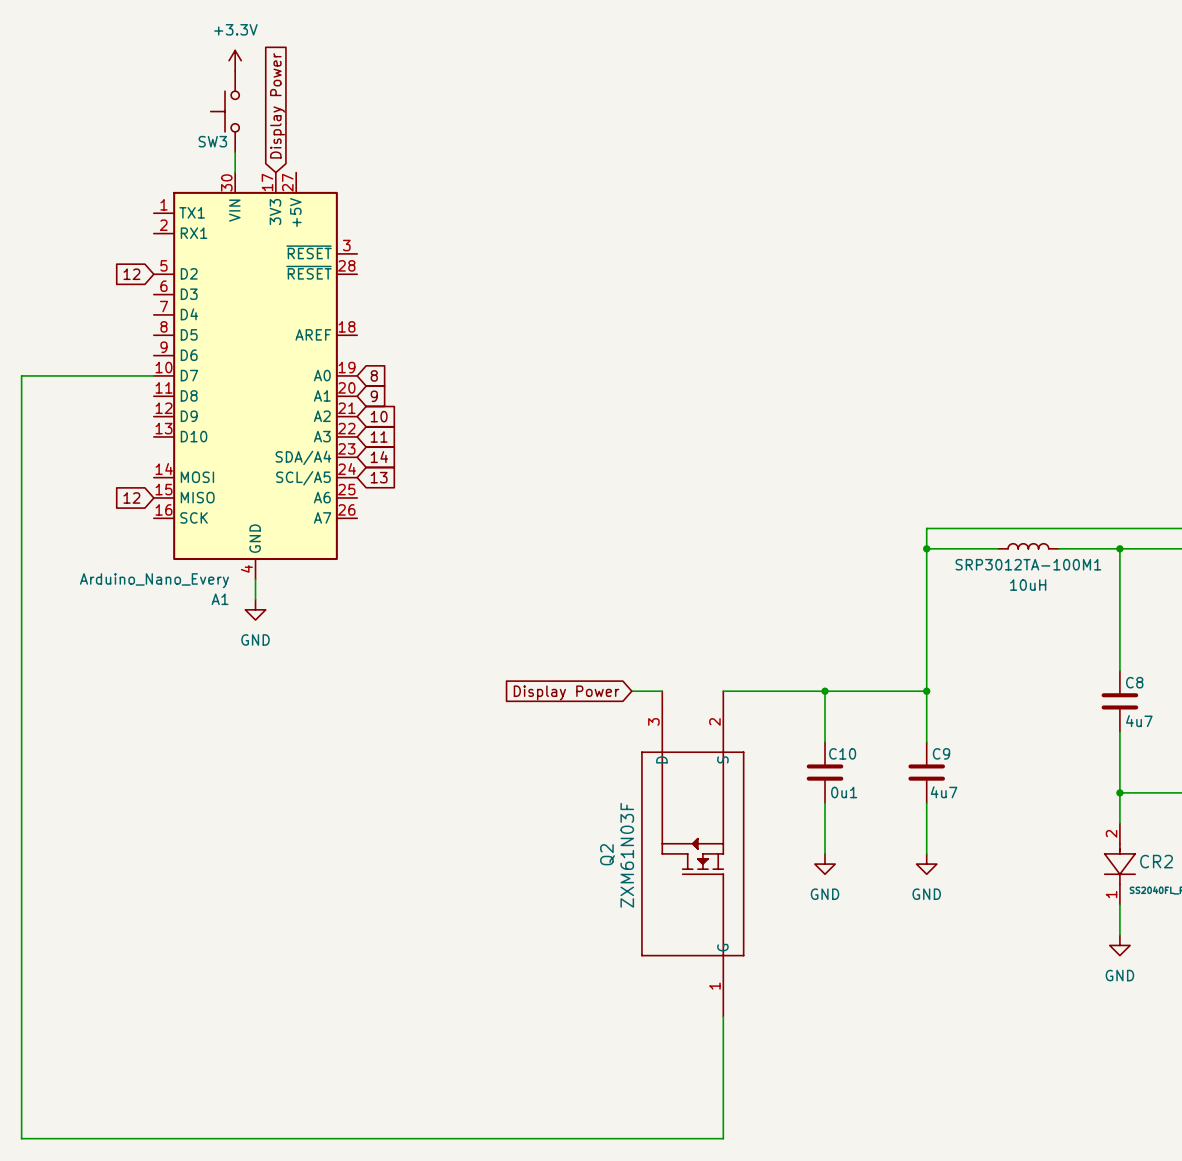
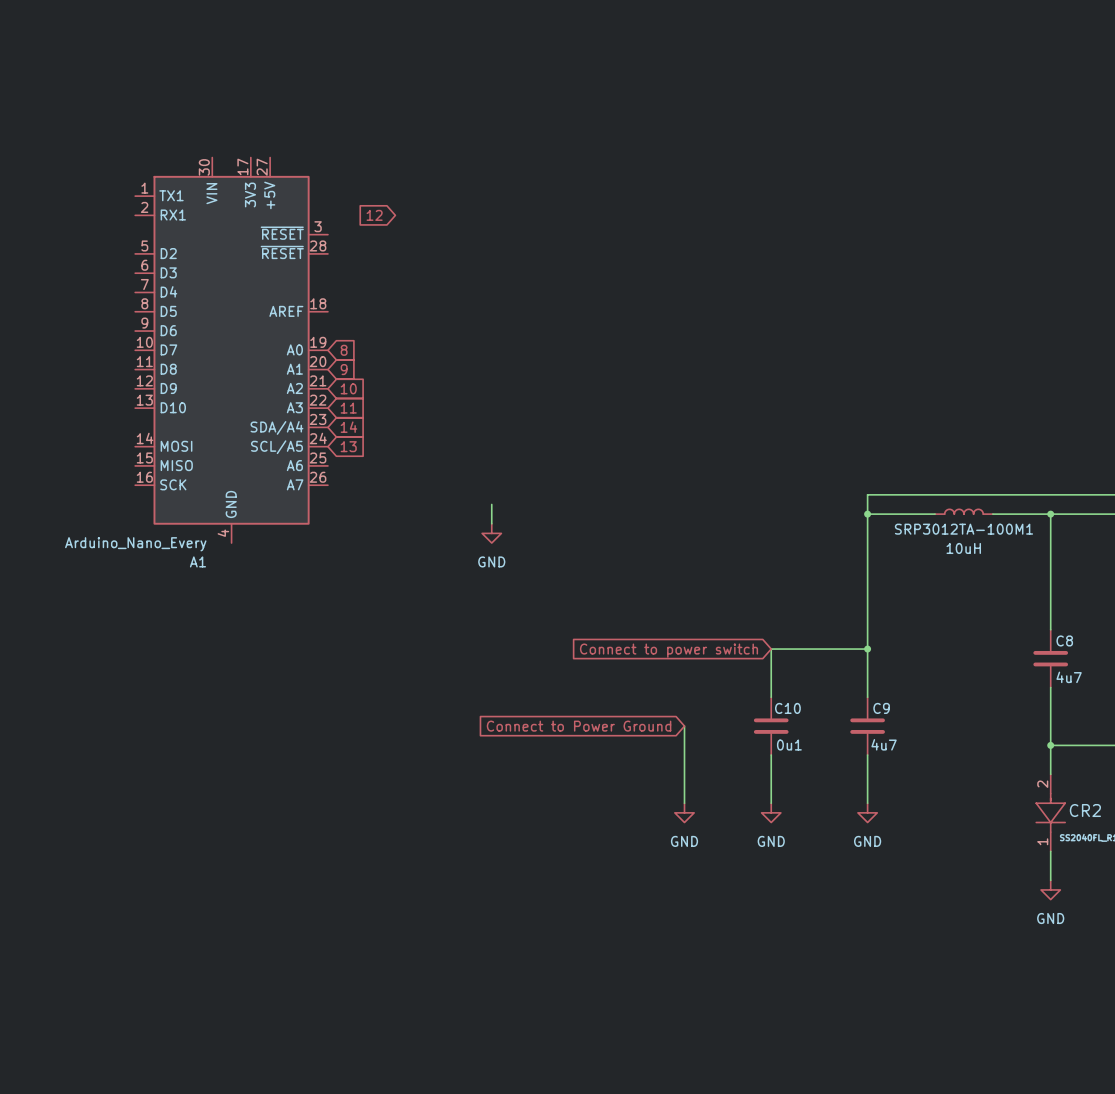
power symbol: +3.3V (235, 60) -> none
global label: Display Power (277, 105) -> none
SW3: (225, 111) -> none
wire: (235, 152) (235, 172) -> none
global label: none -> 12 (374, 215)
global label: 12 (131, 274) -> none
wire: (153, 375) (21, 375) (21, 1138) (723, 1138) (723, 1016) -> none
global label: 12 (131, 497) -> none
wire: none -> (491, 504) (491, 523)
power symbol: none -> GND (491, 533)
wire: (255, 579) (255, 599) -> none
power symbol: GND (255, 609) -> none
wire: (631, 691) (662, 691) -> none
wire: (723, 691) (825, 691) -> none
junction: (825, 691) -> none
global label: Display Power (566, 692) -> none
global label: none -> Connect to power switch (668, 650)
global label: none -> Connect to Power Ground (579, 726)
wire: none -> (684, 726) (684, 803)
Q2: ZXM61N03F (692, 853) -> none
power symbol: none -> GND (684, 812)

